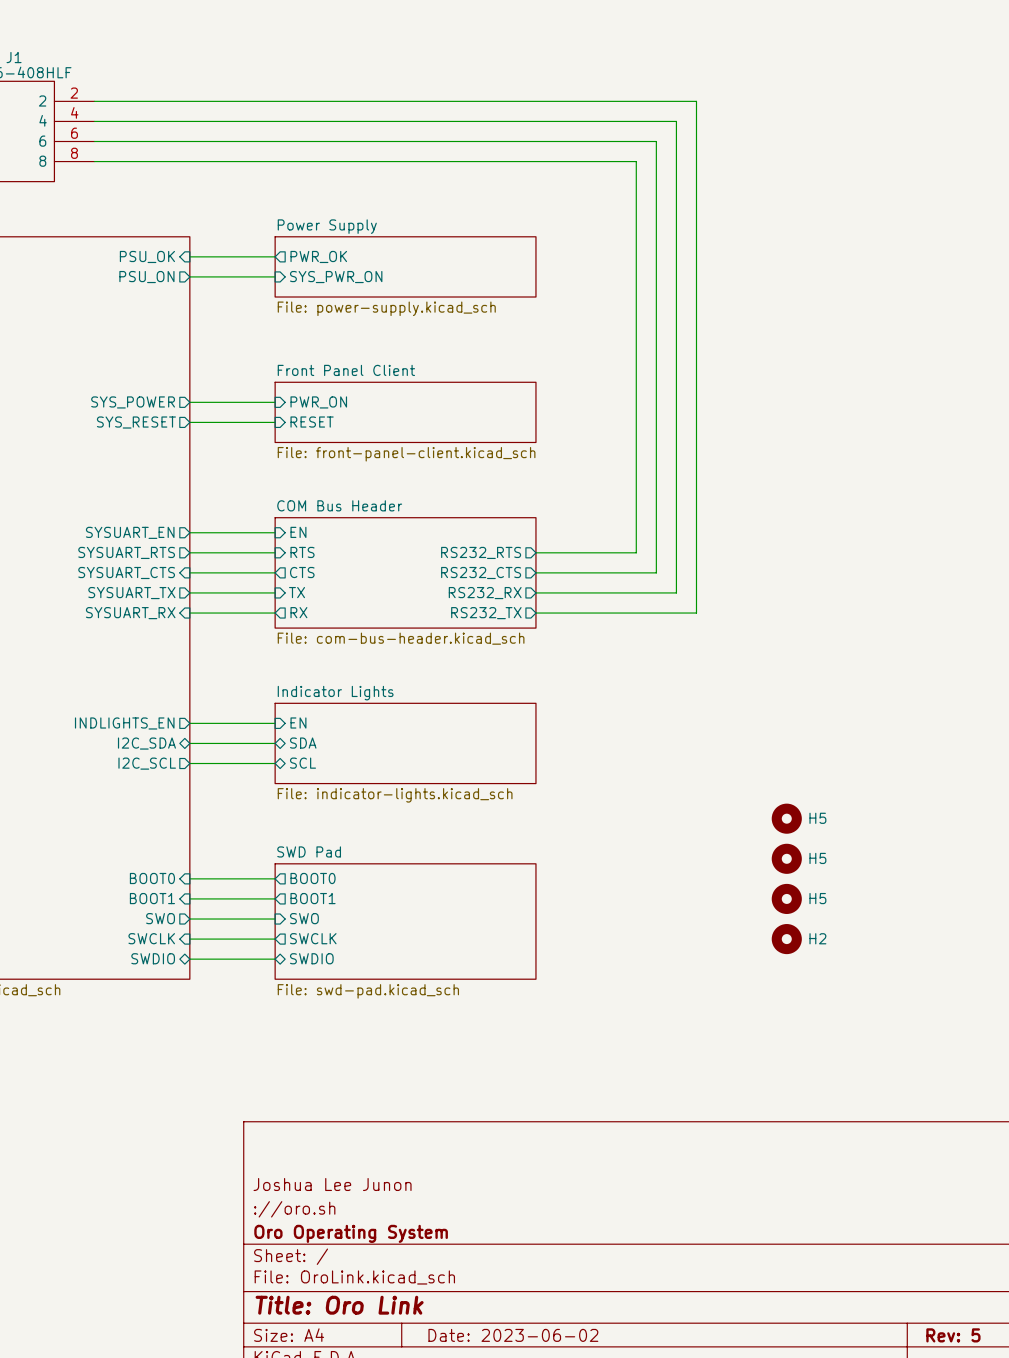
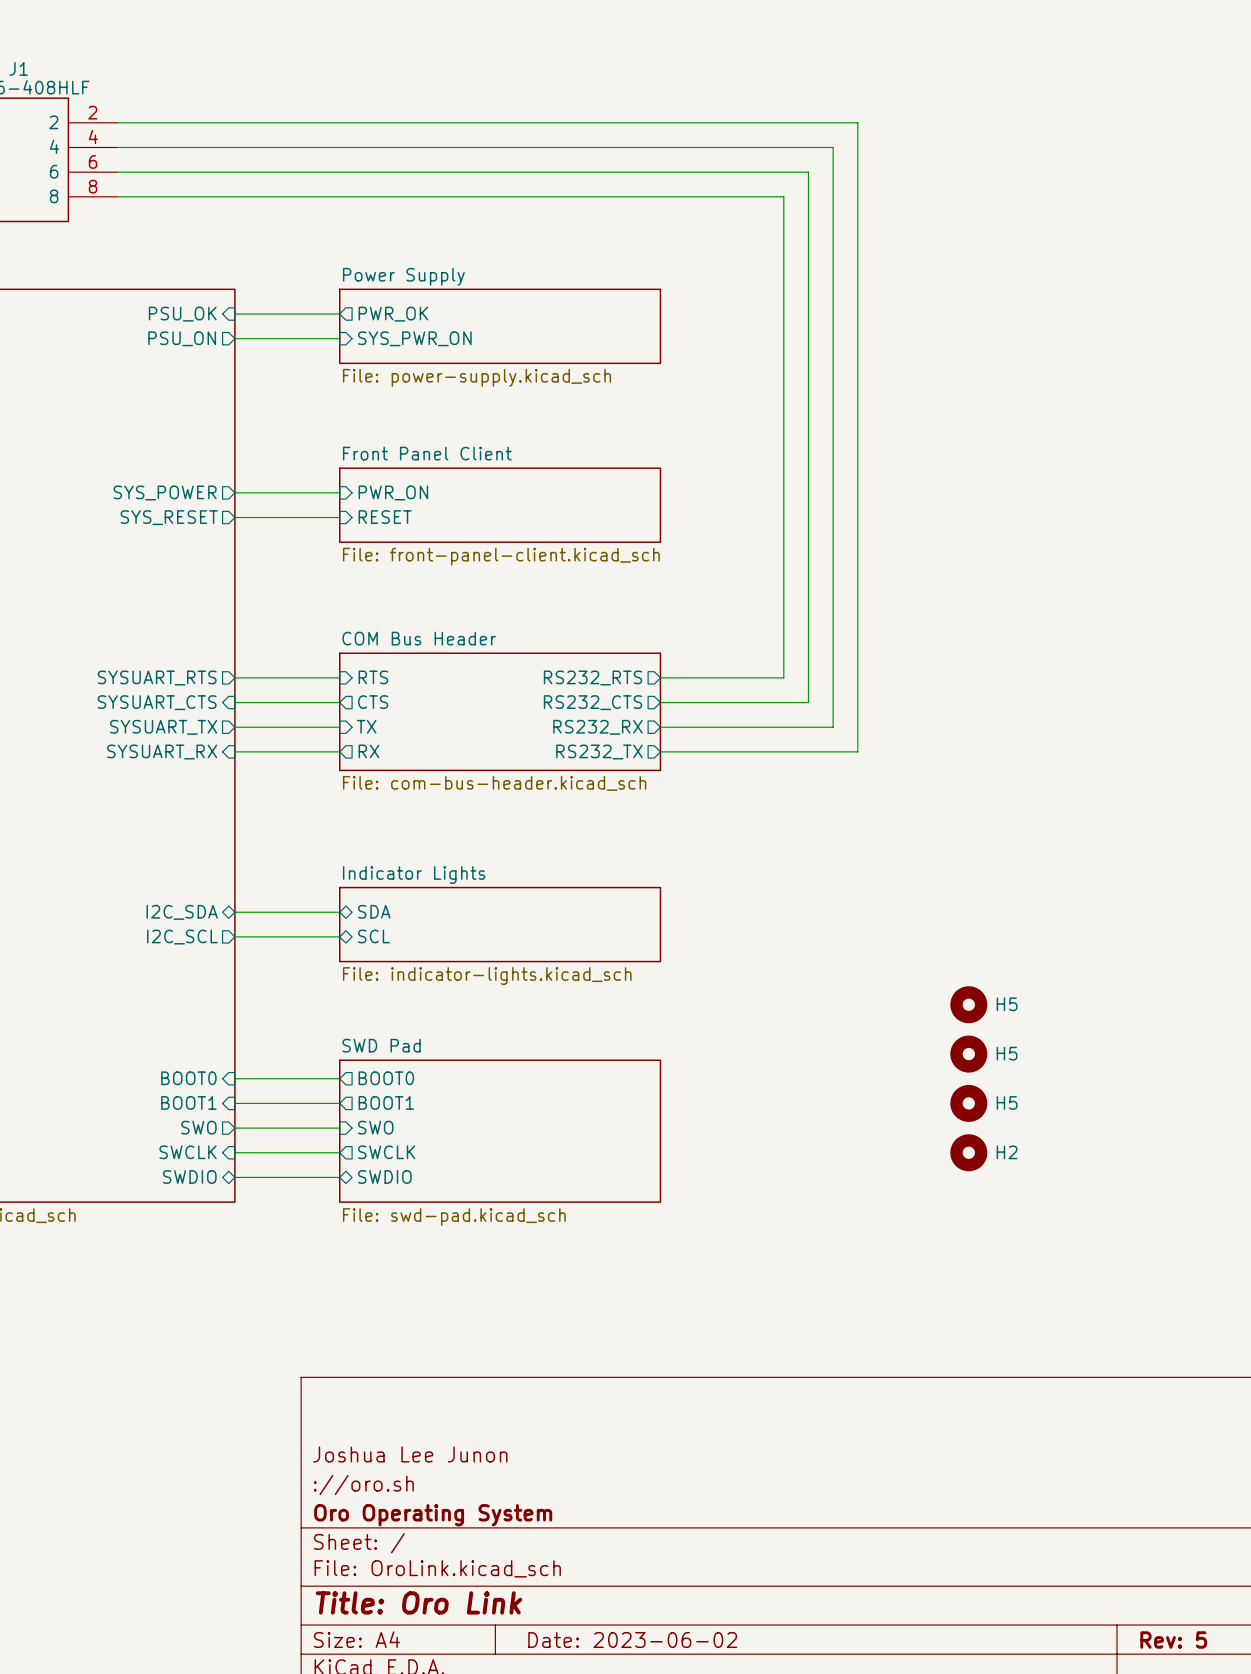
sheet COM Bus Header shape: [274, 517, 537, 629] -> [339, 652, 662, 772]
sheet pin: SYSUART_EN (130, 532) -> none
wire: (189, 532) (275, 532) -> none
sheet pin: EN (298, 532) -> none
sheet pin: INDLIGHTS_EN (124, 723) -> none
wire: (189, 723) (275, 723) -> none
sheet pin: EN (298, 723) -> none
sheet Indicator Lights: File: indicator-lights.kicad_sch (405, 743) -> none
sheet Indicator Lights: none -> File: indicator-lights.kicad_sch (500, 924)

